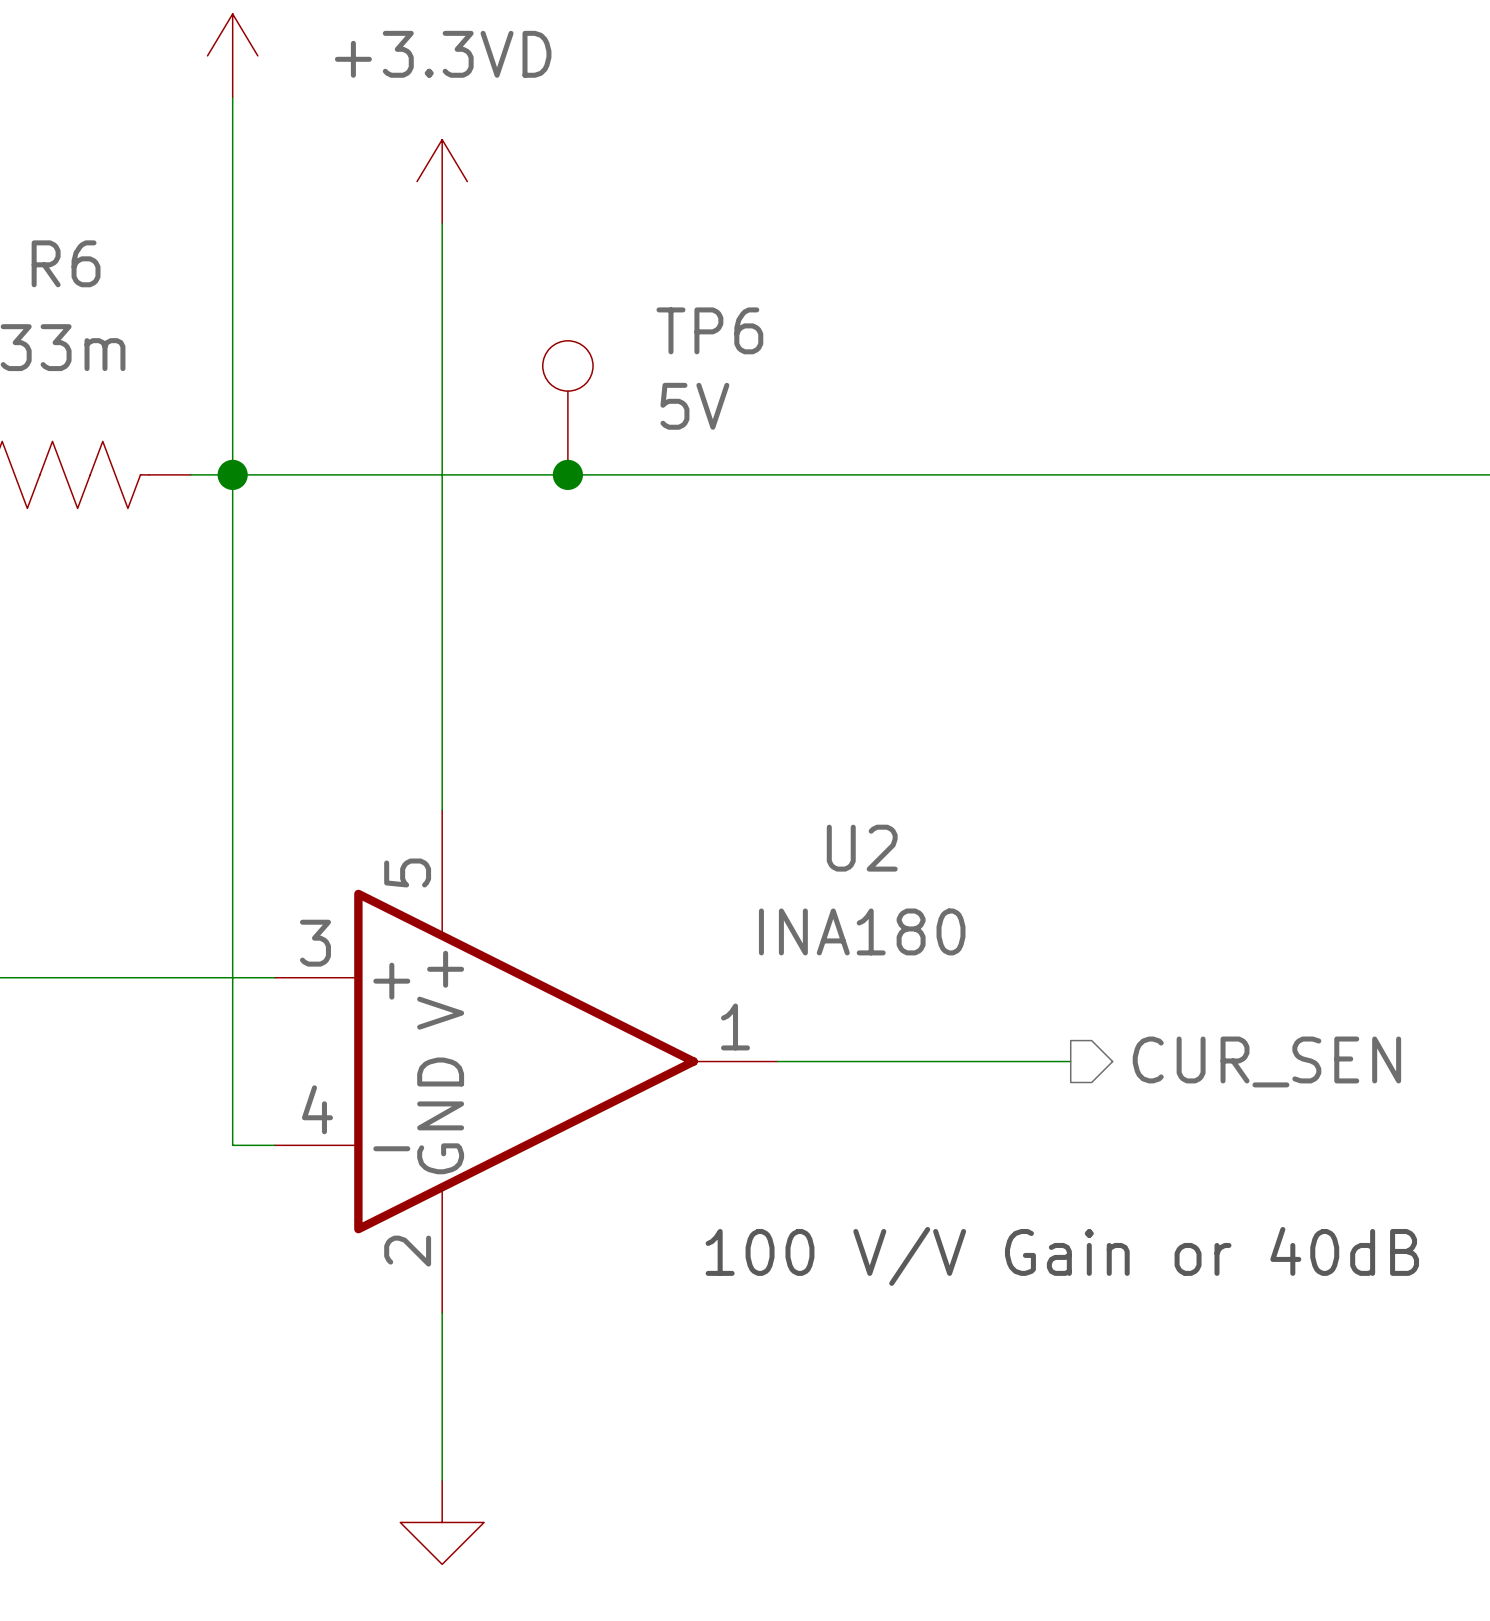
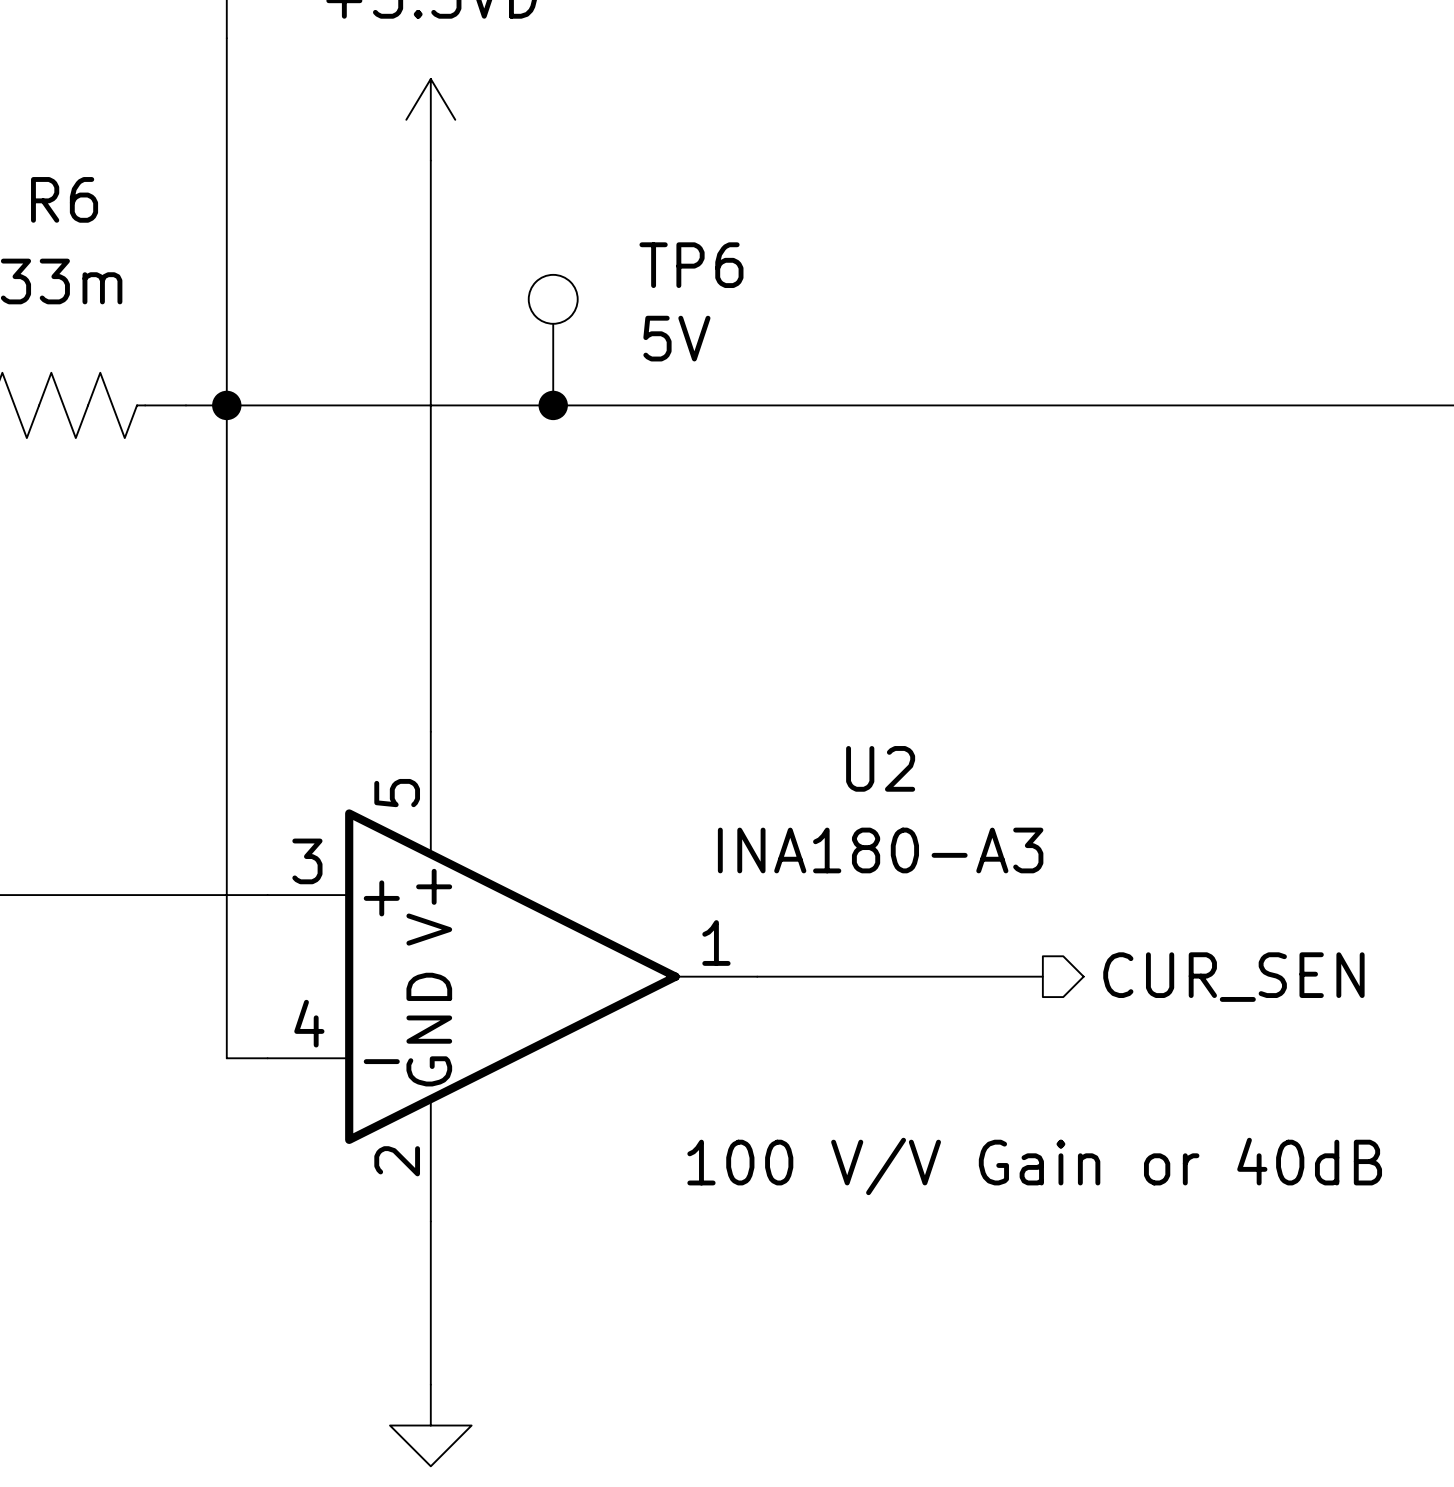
U2 name position: U2 (862, 848) -> U2 (880, 768)
U2 value: INA180 (862, 931) -> INA180-A3 (880, 850)

